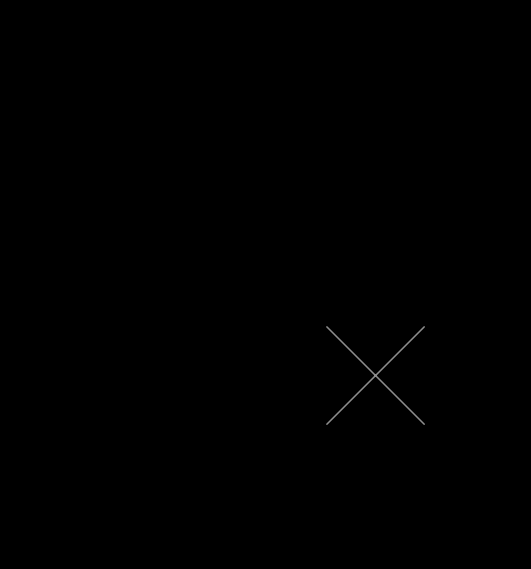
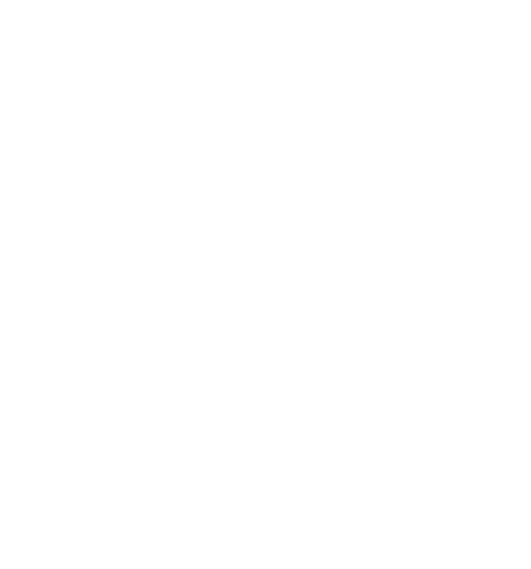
no-connect mark: (375, 375) -> none

